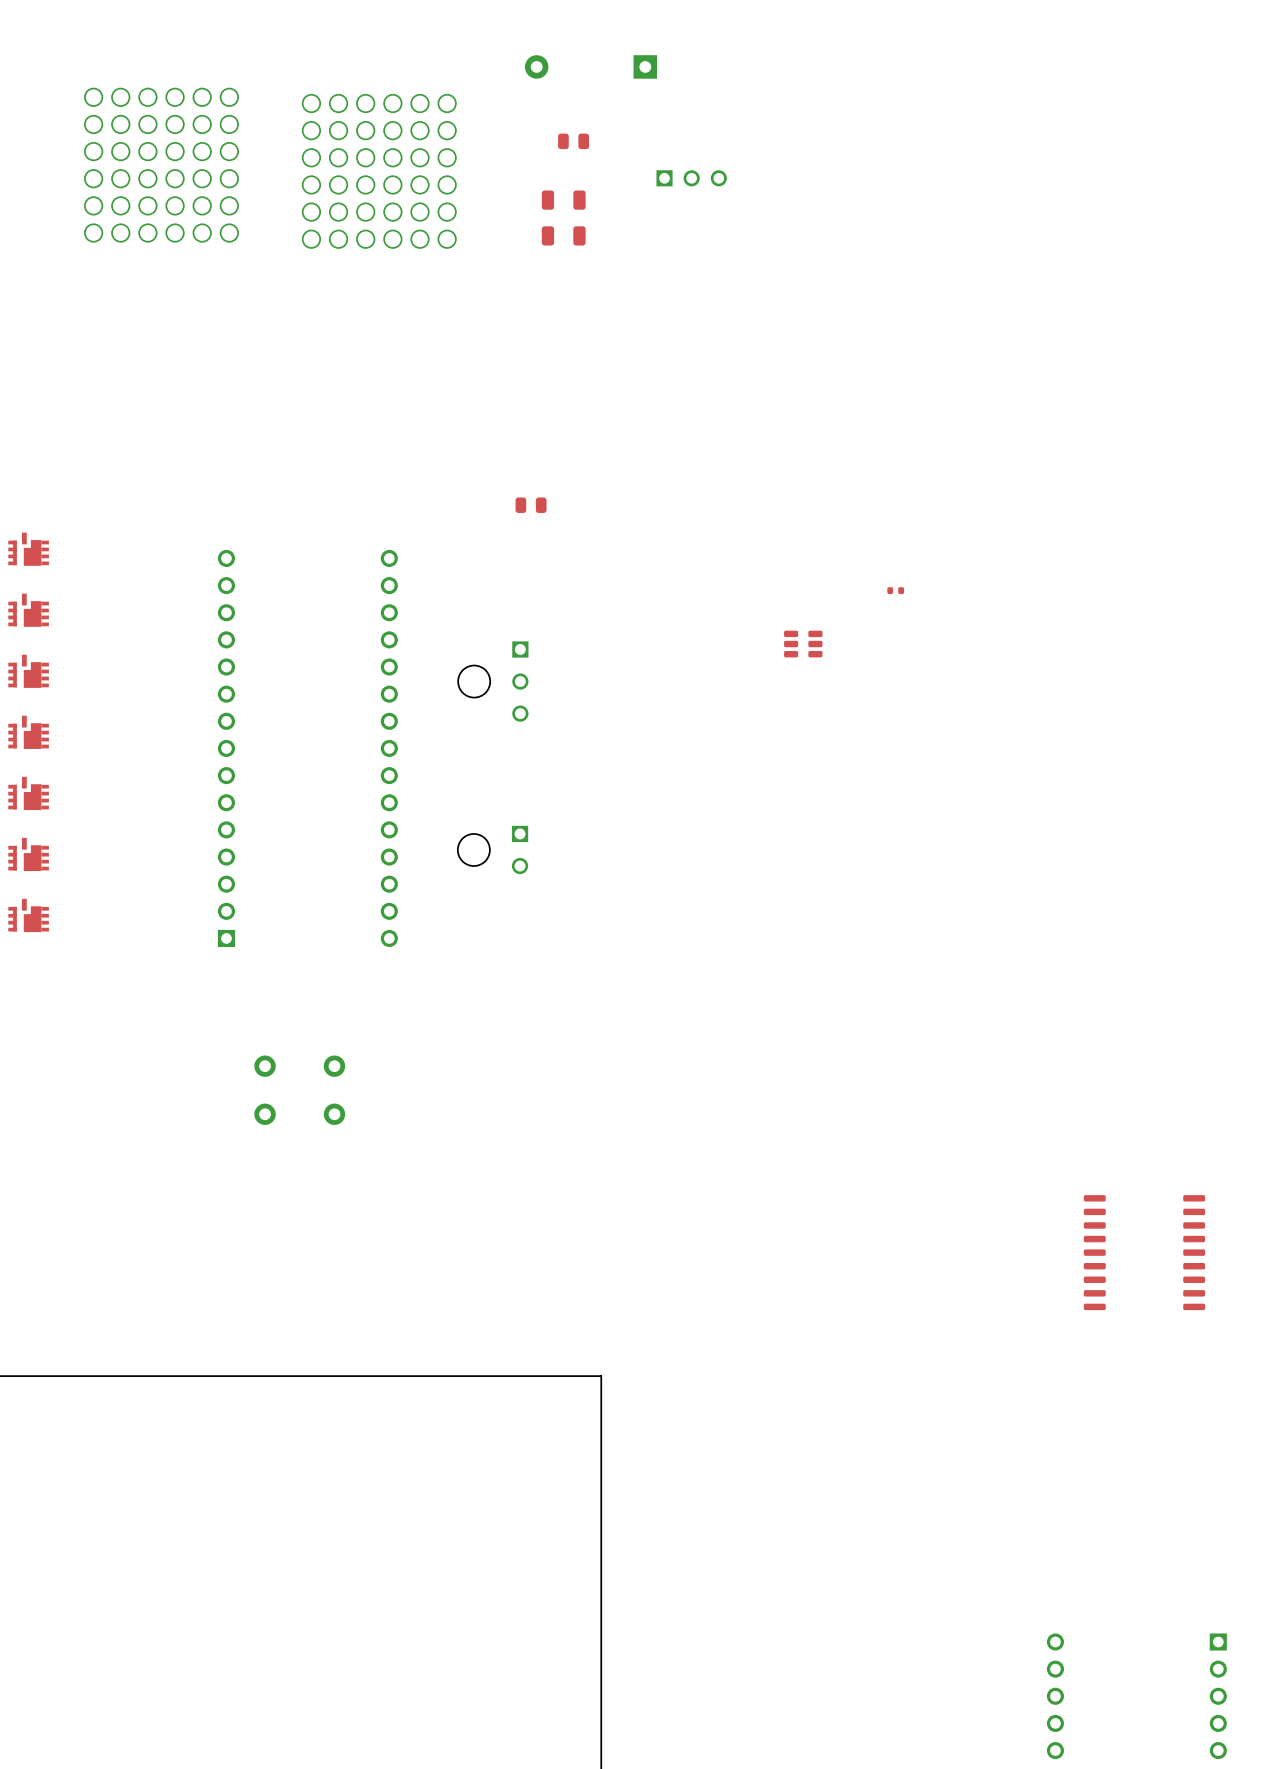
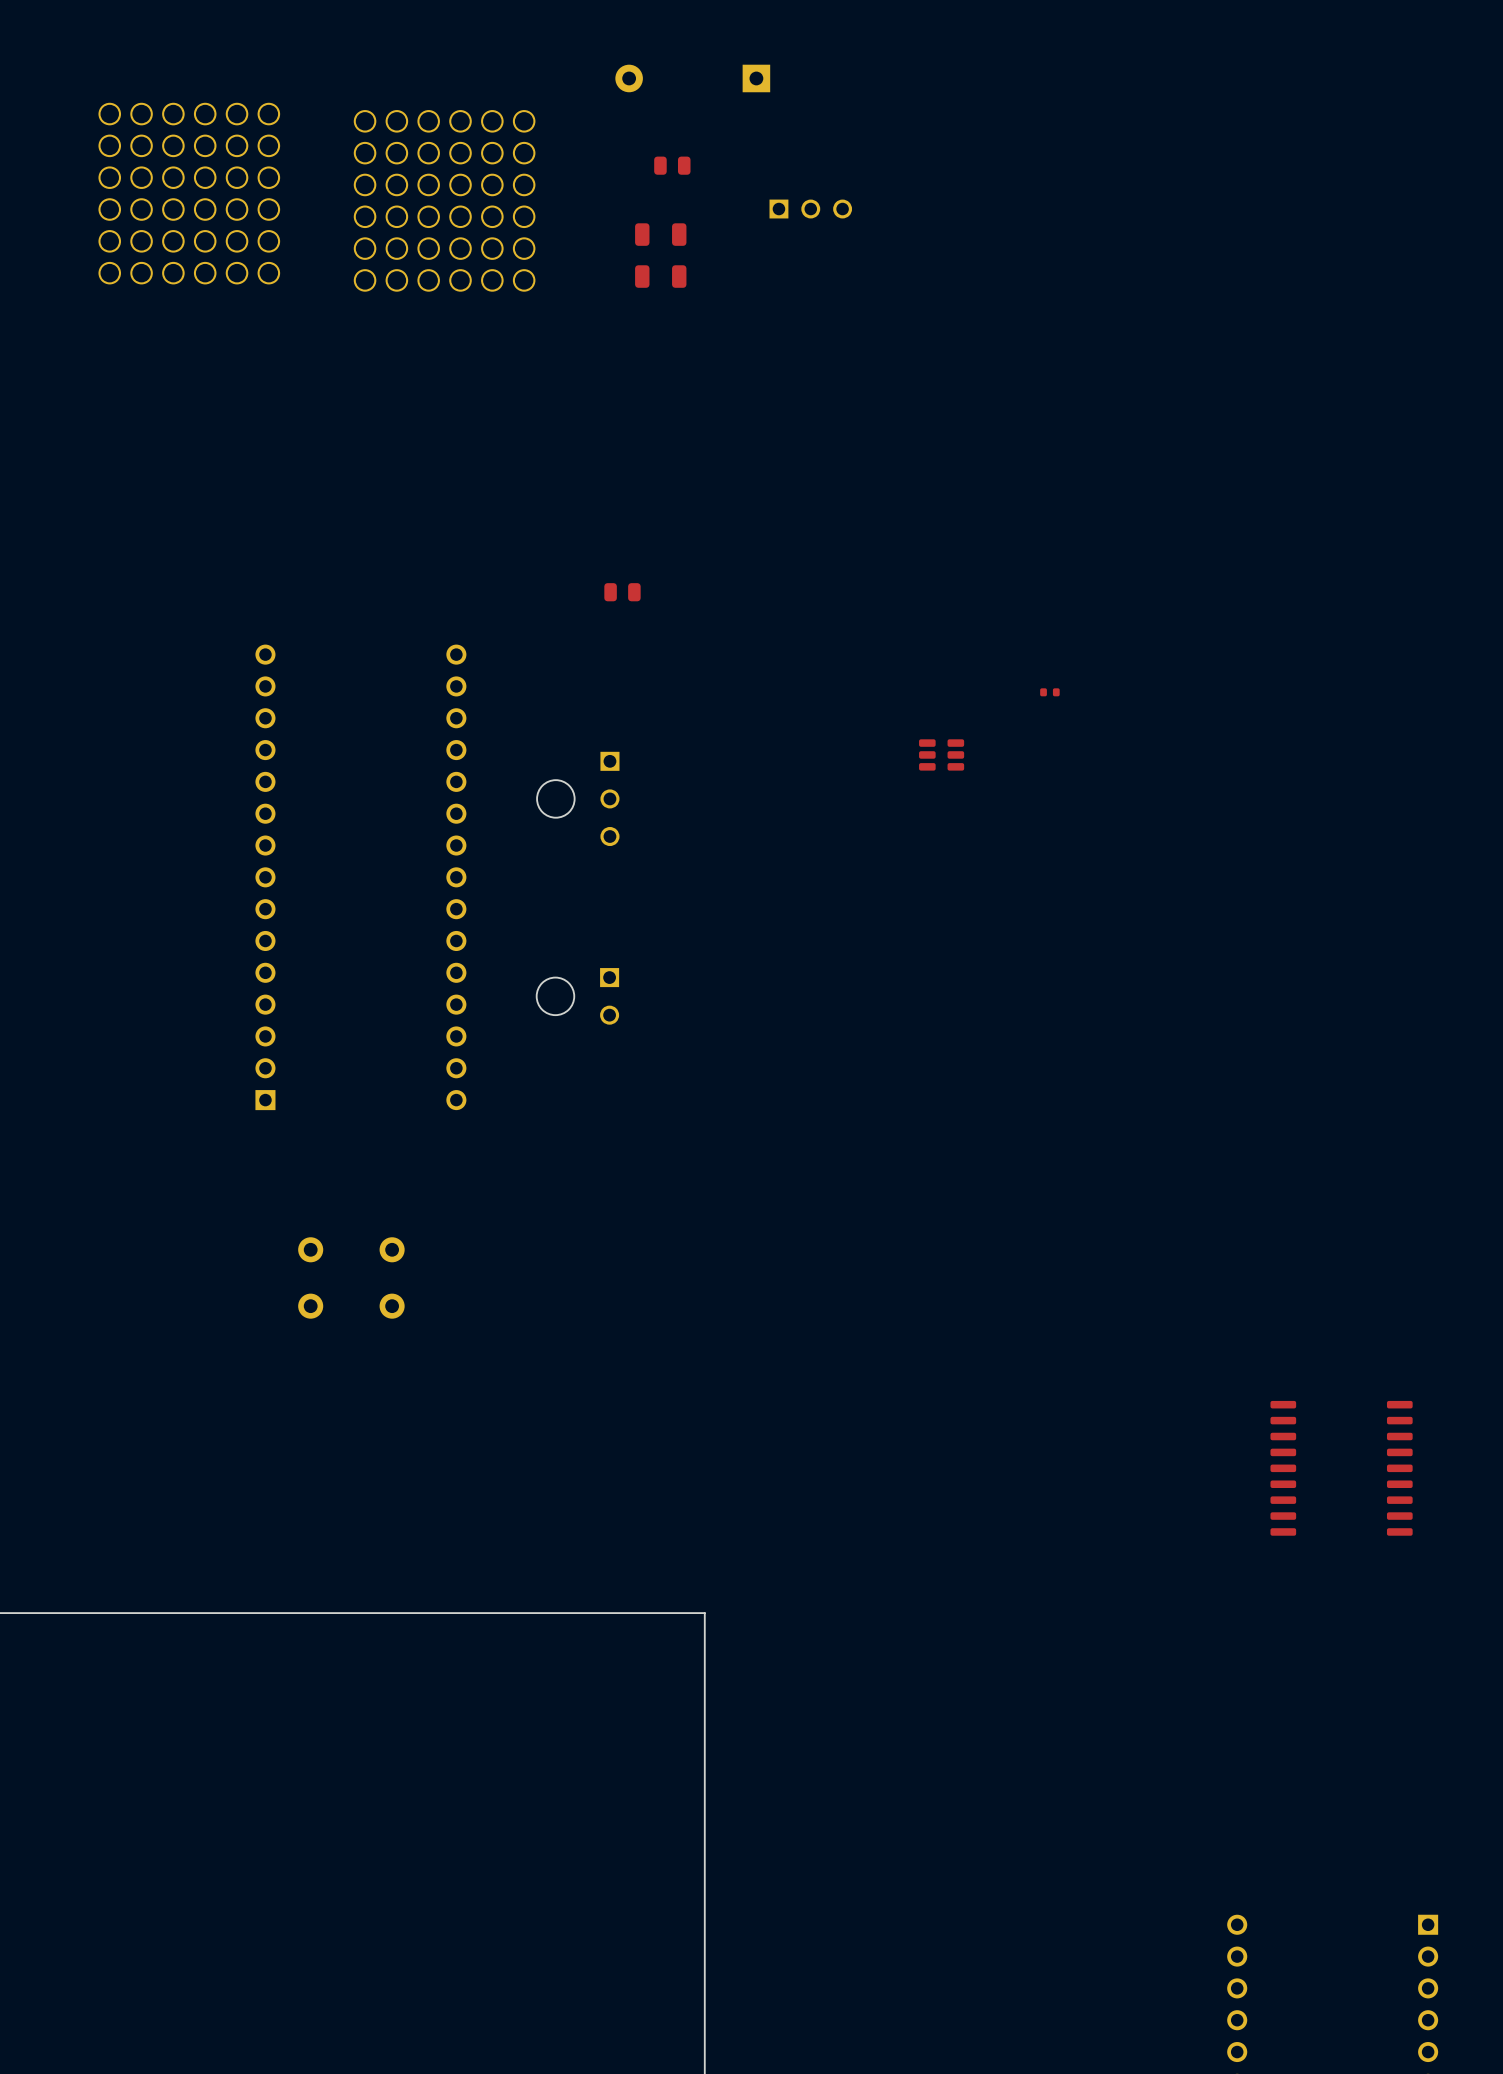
part: (28, 549) -> none
part: (28, 610) -> none
part: (28, 671) -> none
part: (28, 732) -> none
part: (28, 793) -> none
part: (28, 854) -> none
part: (28, 915) -> none

